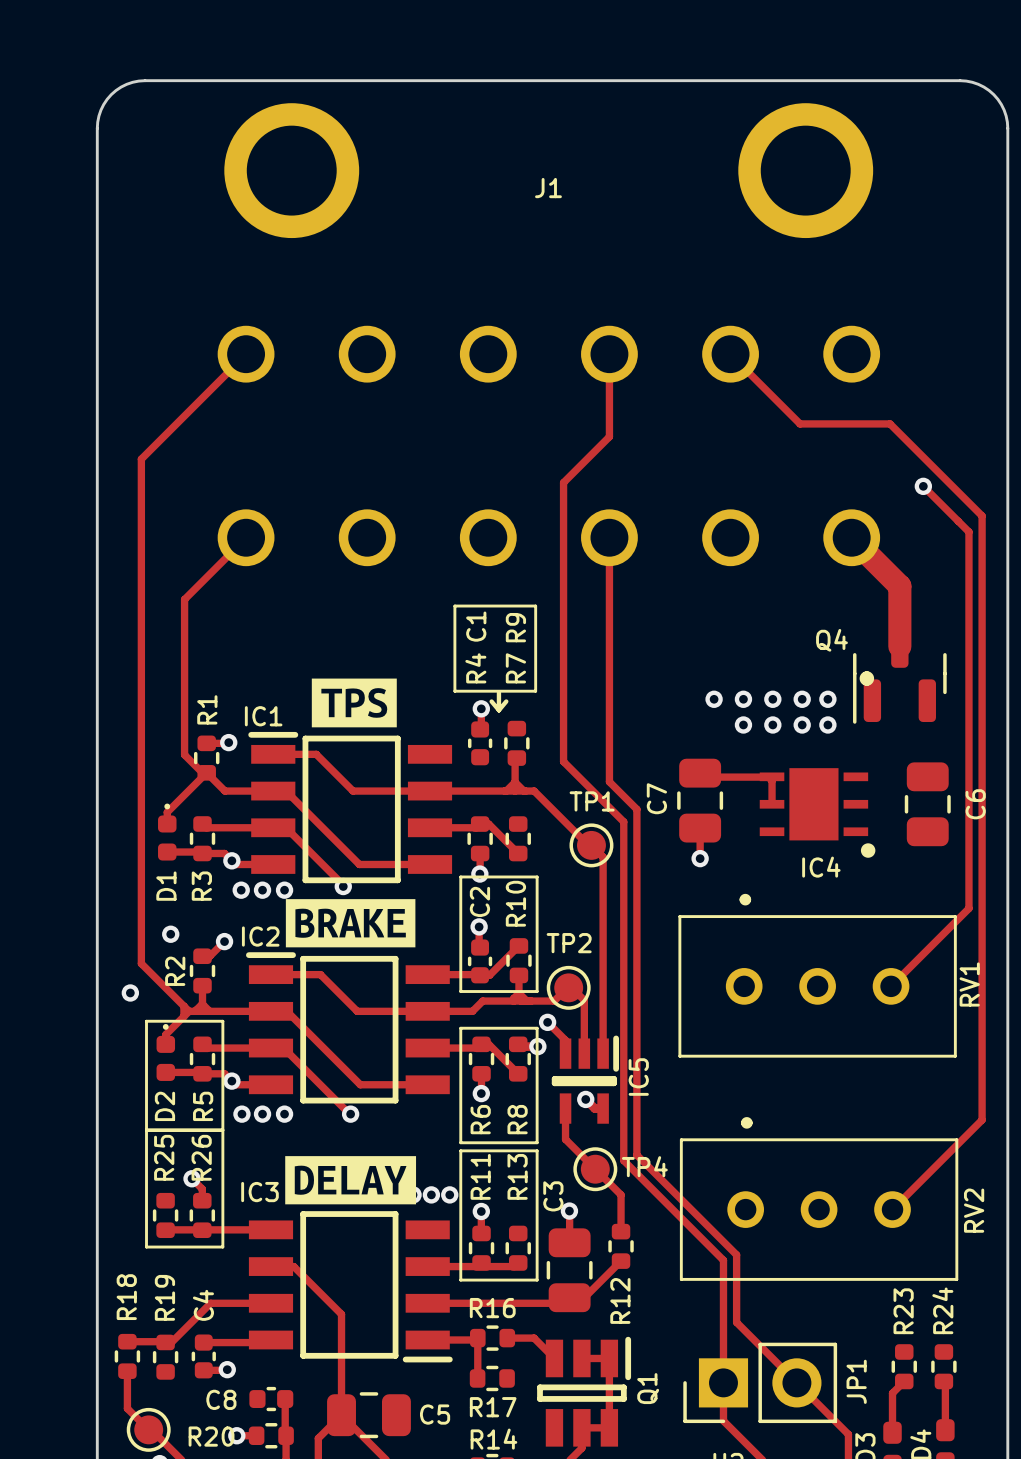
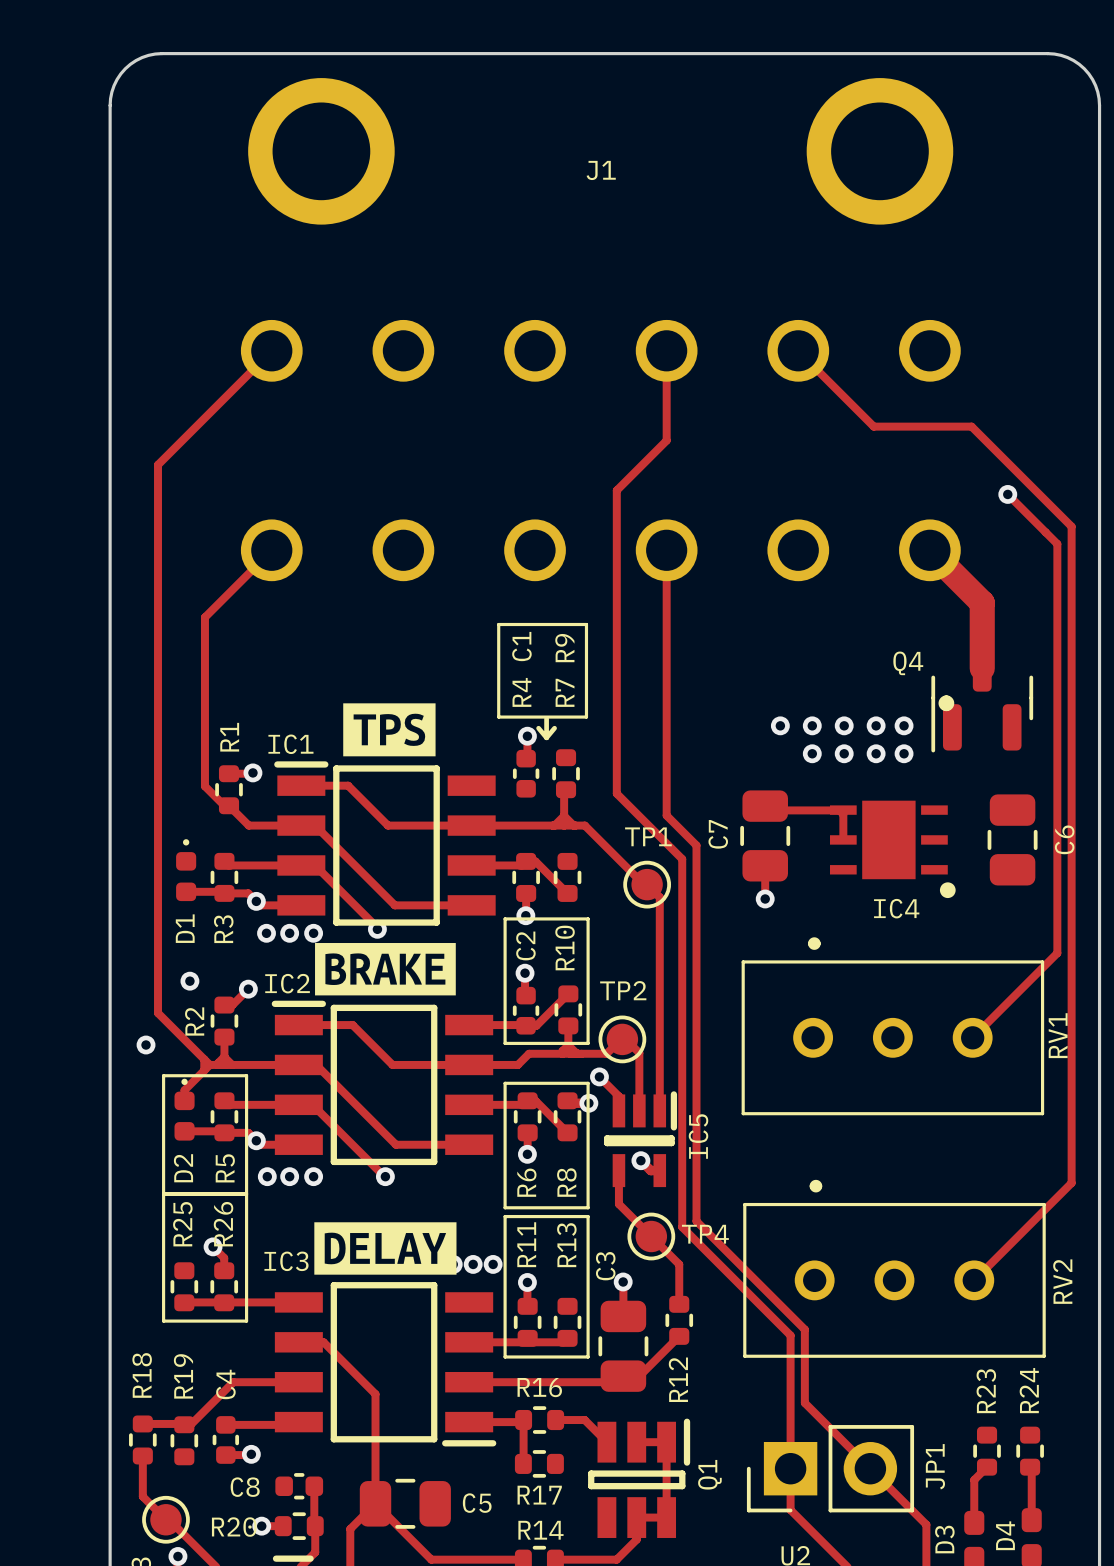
track: (206, 772) (167, 812) (167, 823) -> none

